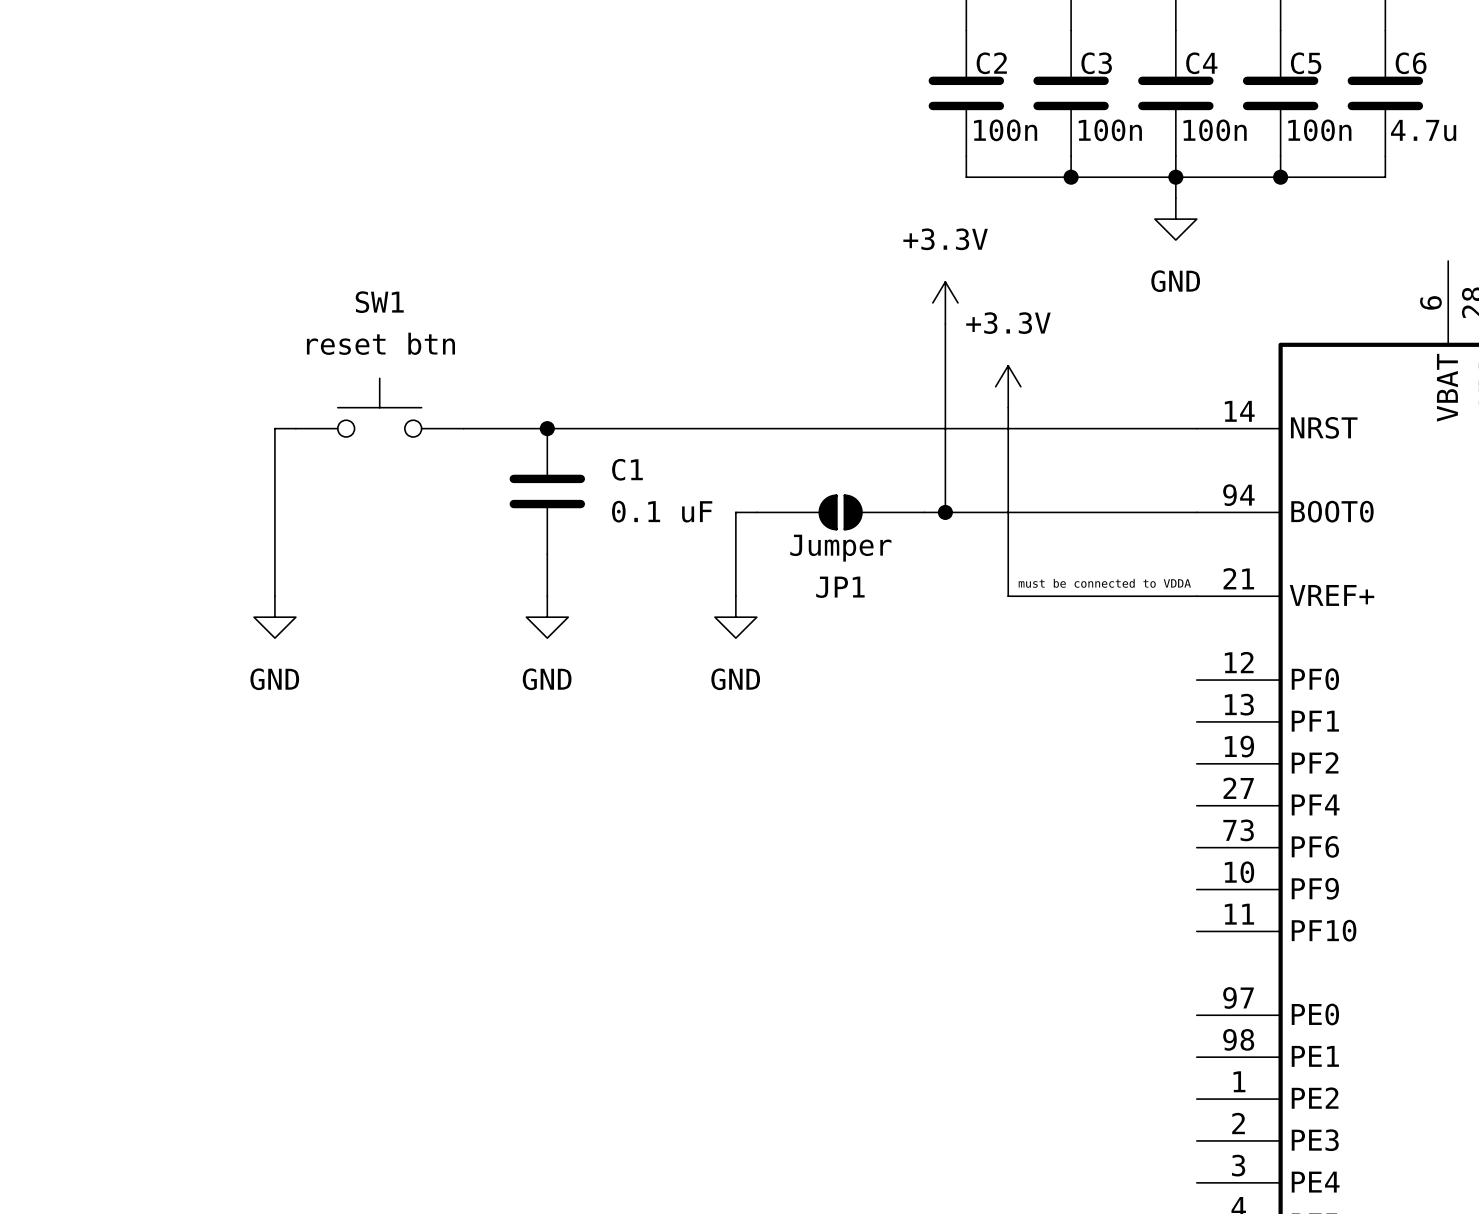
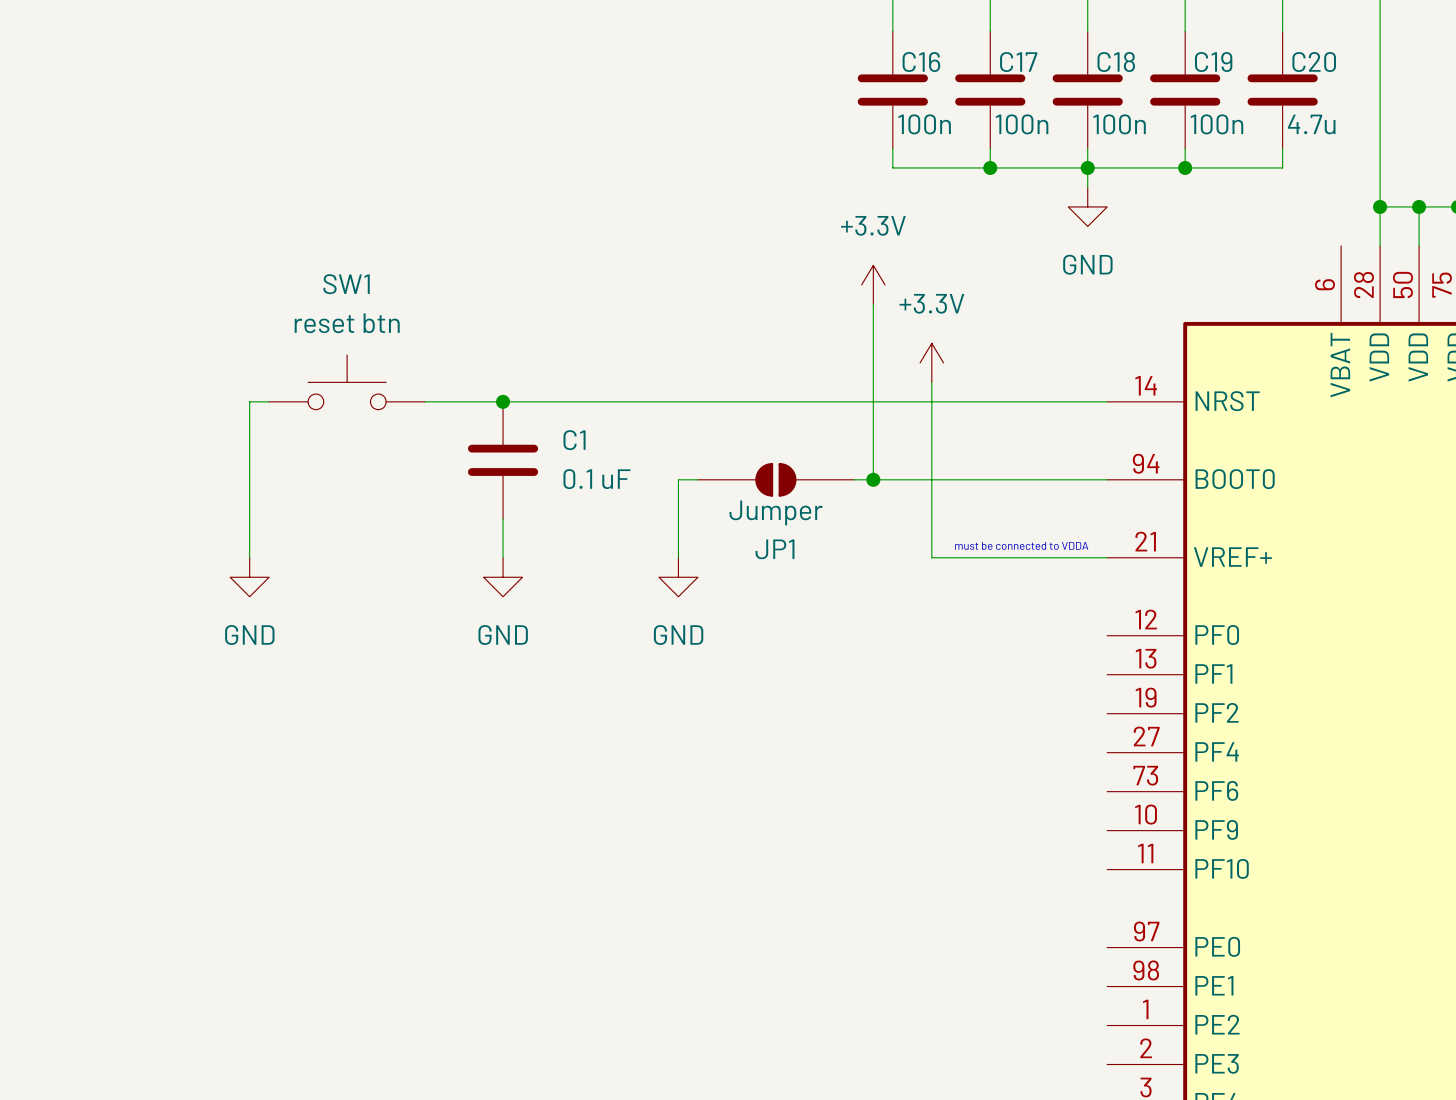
C2 name: C2 (991, 63) -> C16 (921, 62)
C3 name: C3 (1096, 63) -> C17 (1018, 62)
C4 name: C4 (1201, 63) -> C18 (1116, 61)
C5 name: C5 (1306, 63) -> C19 (1213, 62)
C6 name: C6 (1411, 63) -> C20 (1314, 62)

